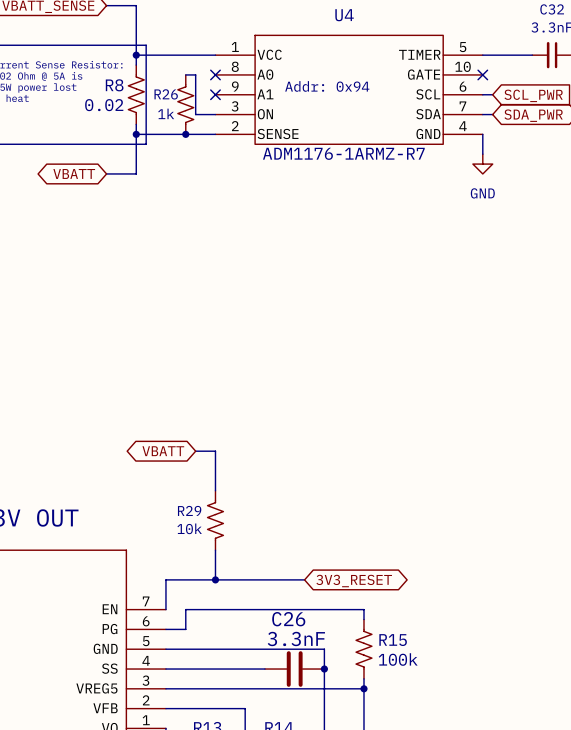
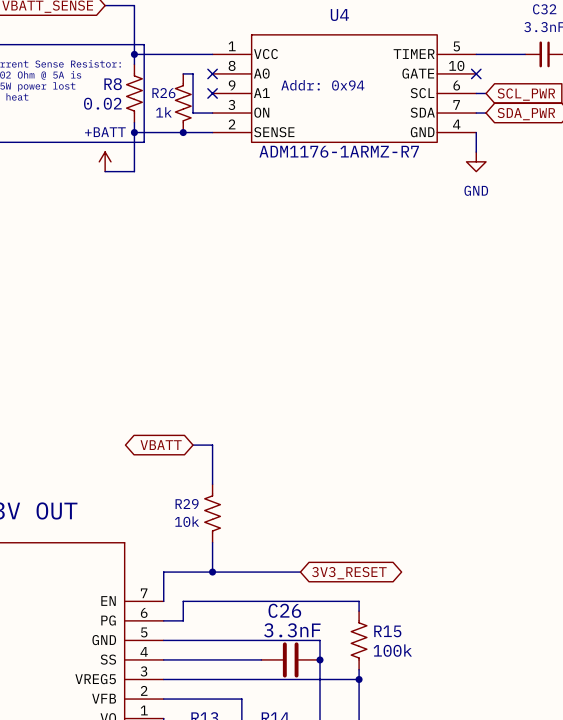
power symbol: none -> +BATT (105, 161)
global label: VBATT (74, 173) -> none

